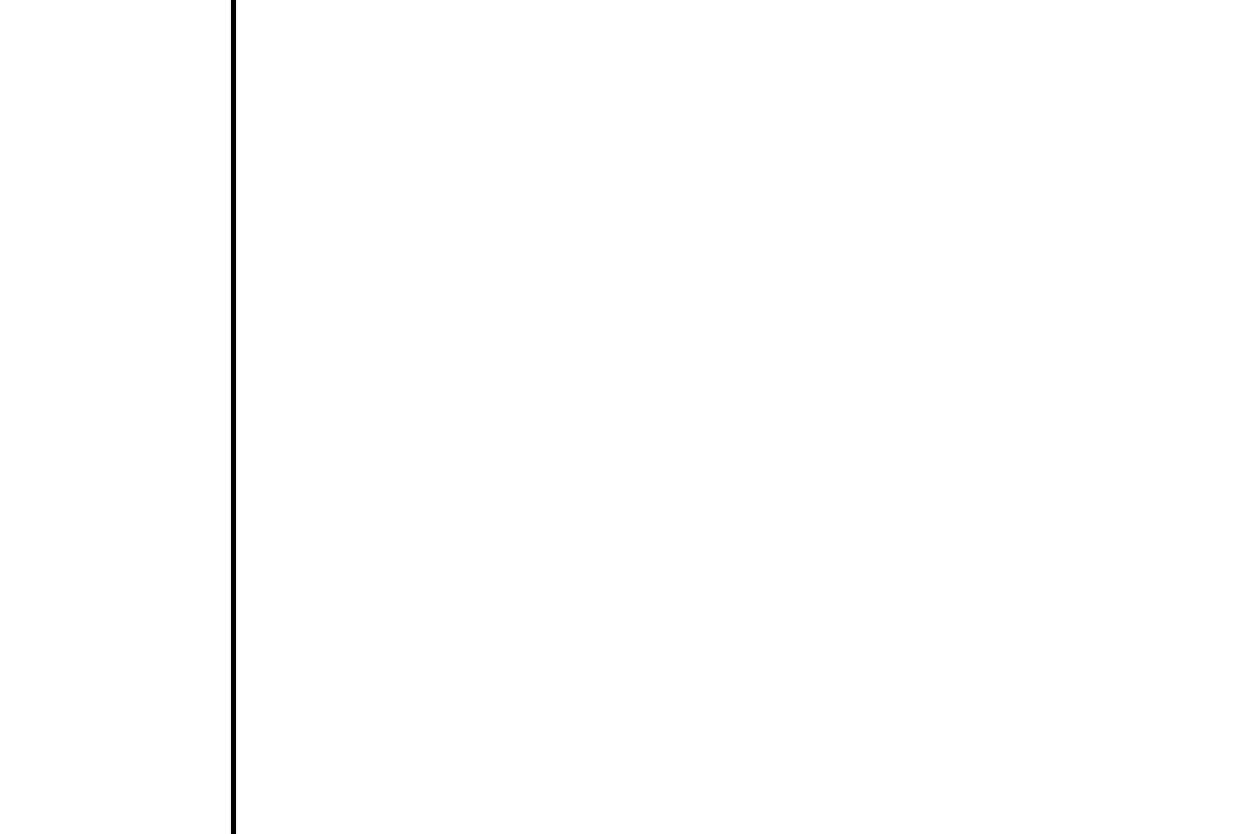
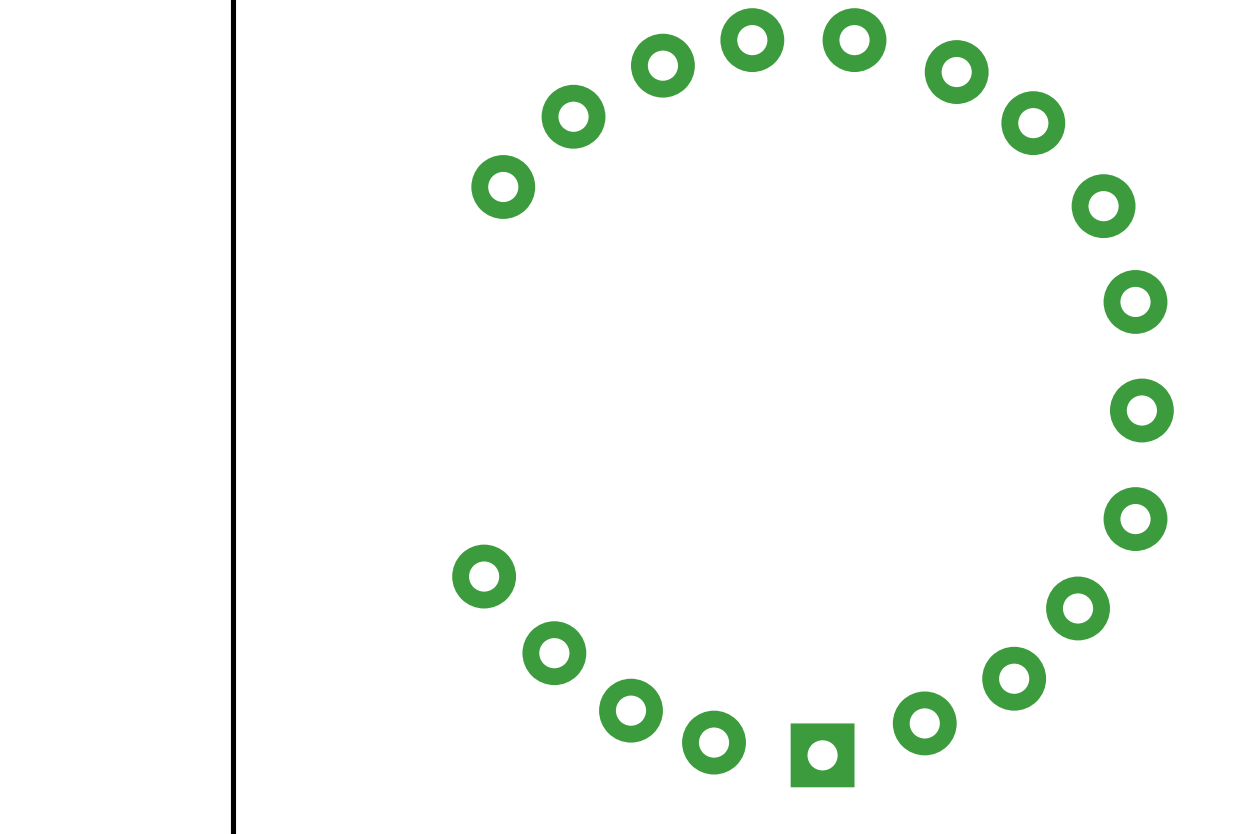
part: none -> (813, 397)

